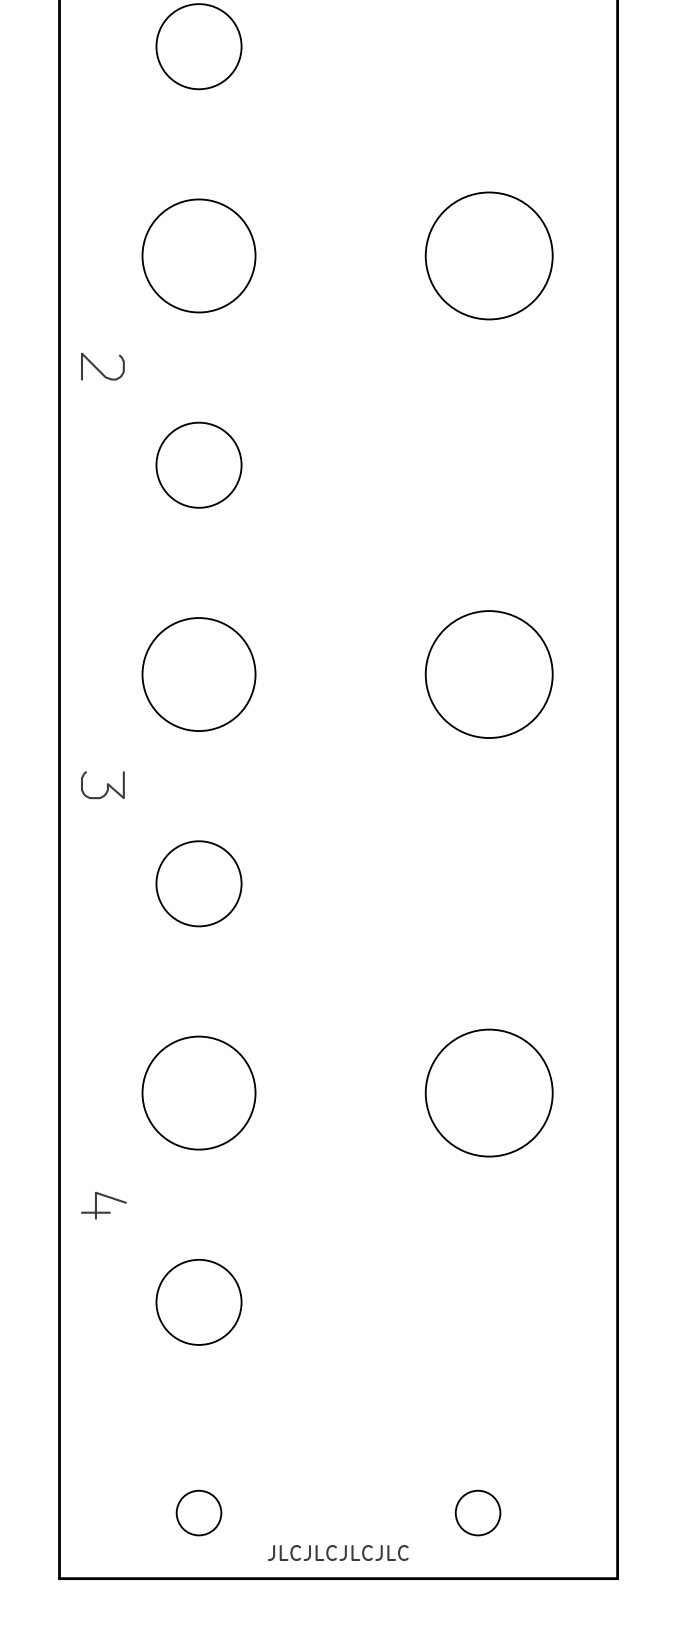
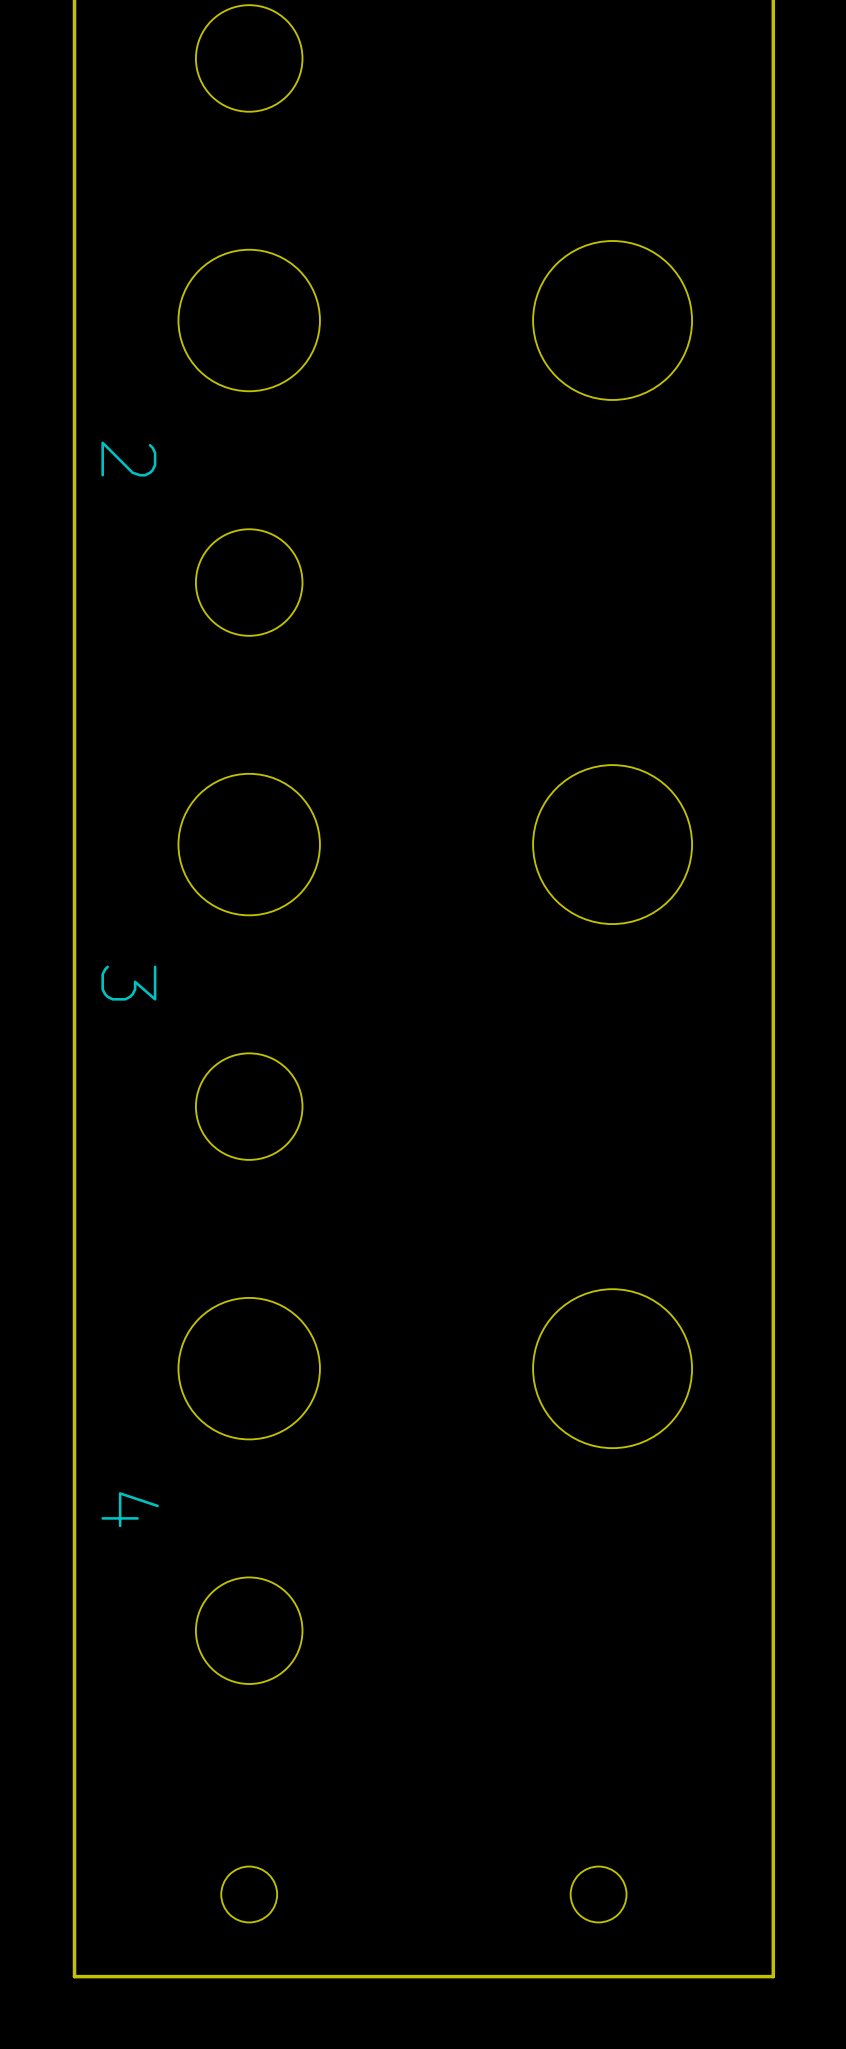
text: JLCJLCJLCJLC (338, 1553) -> none

